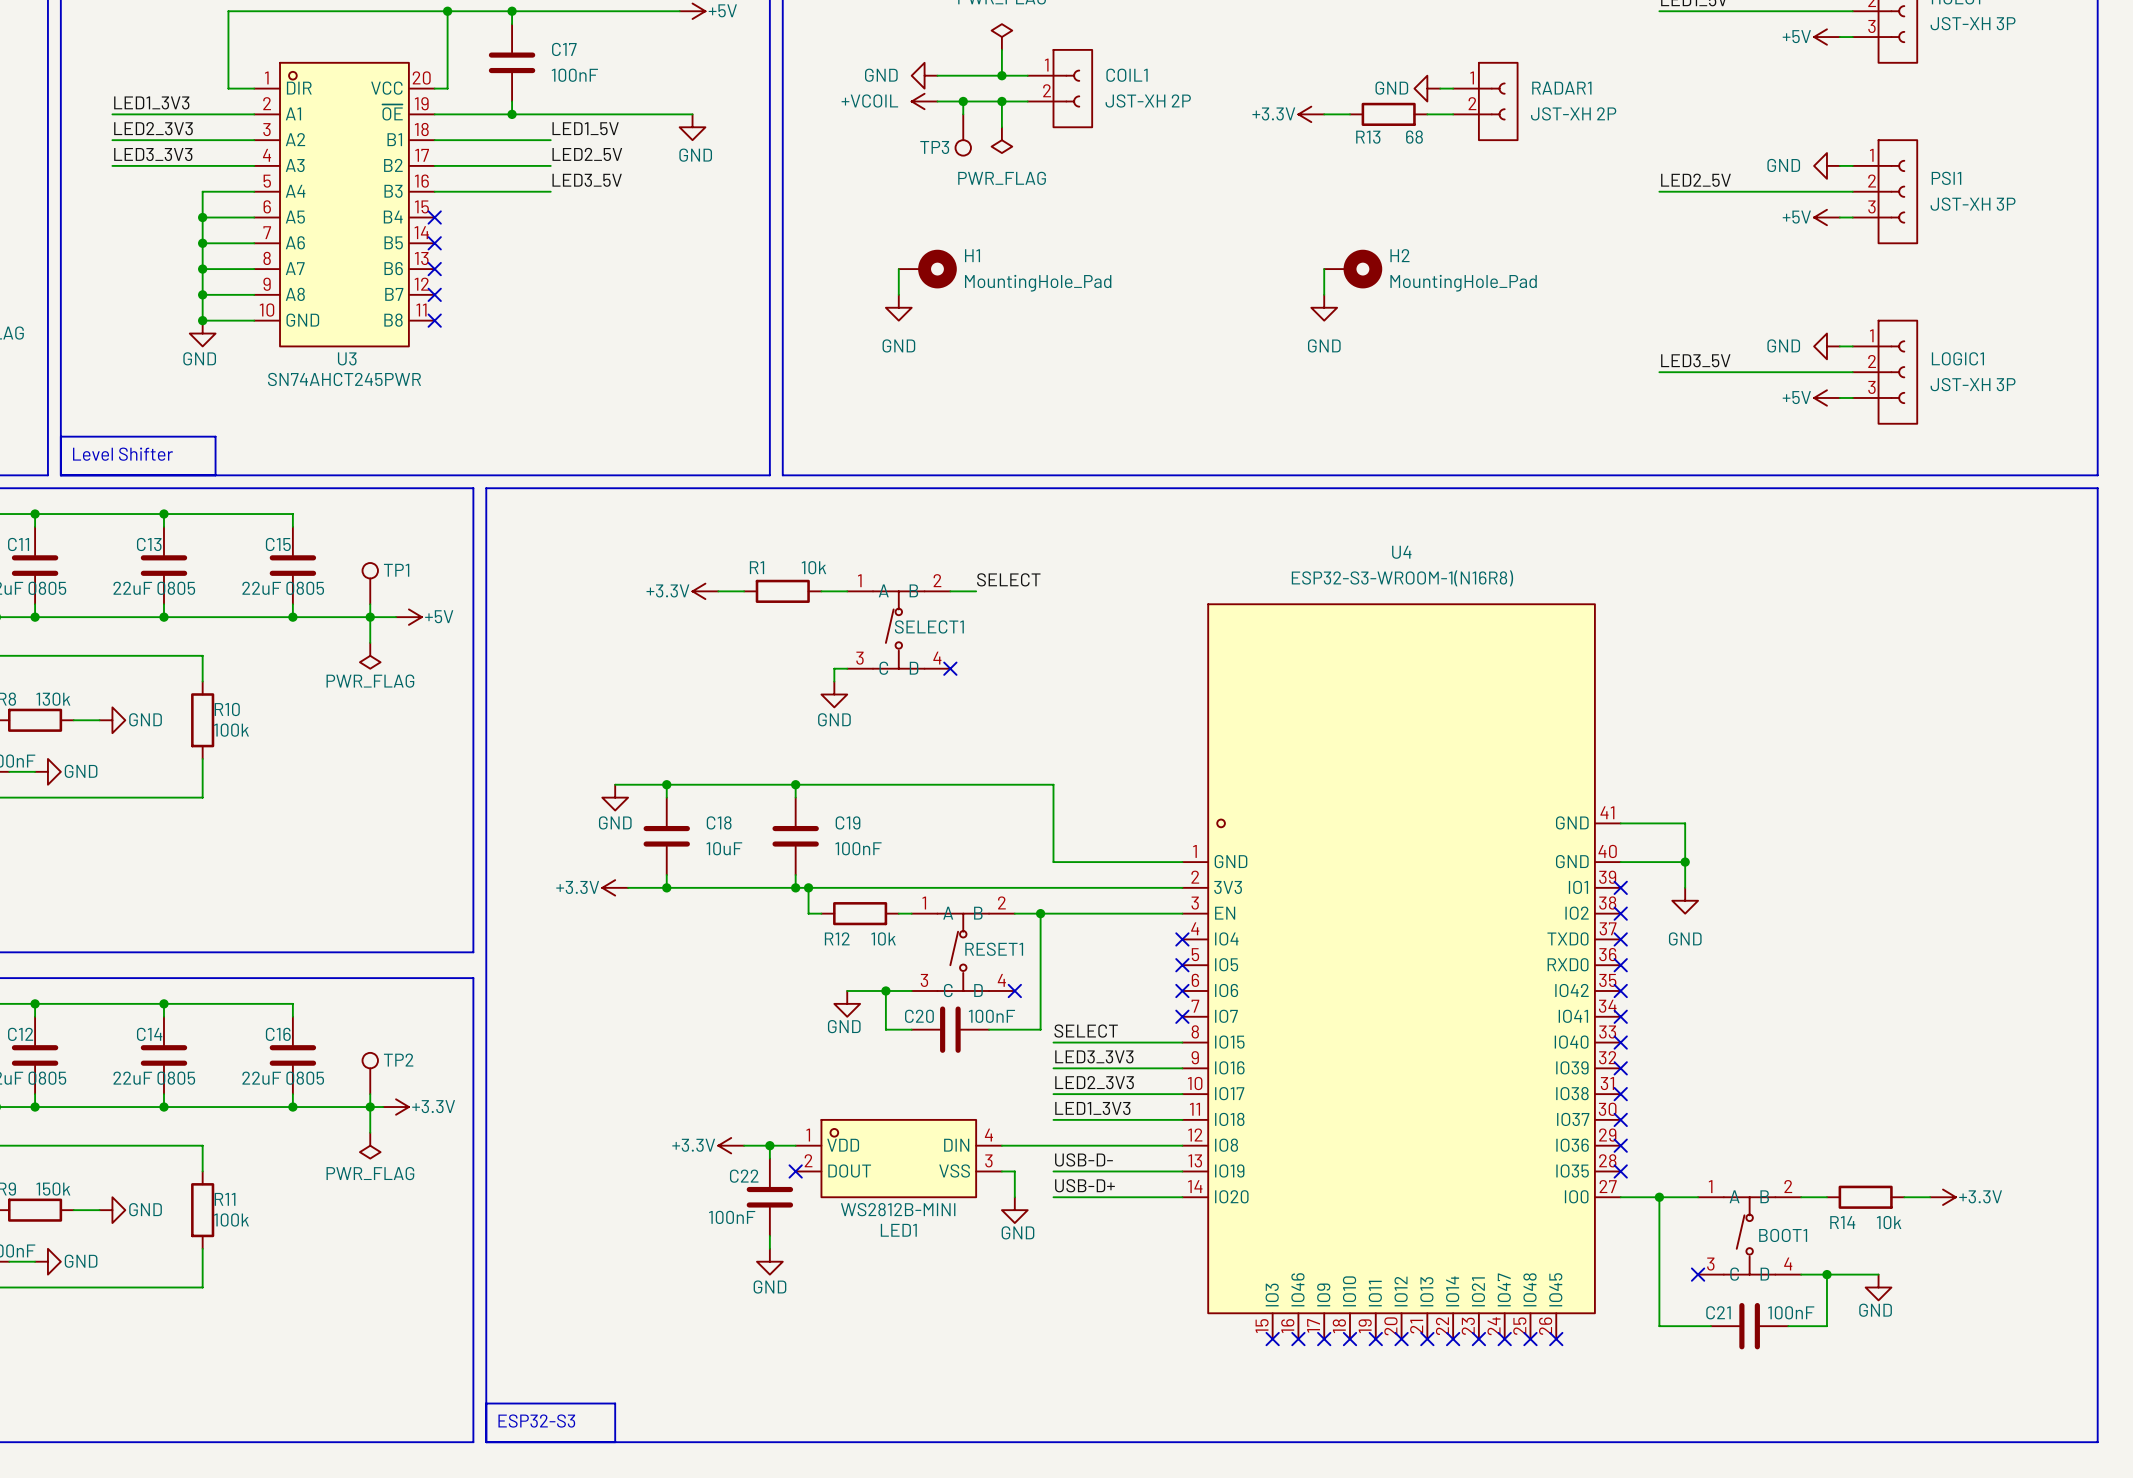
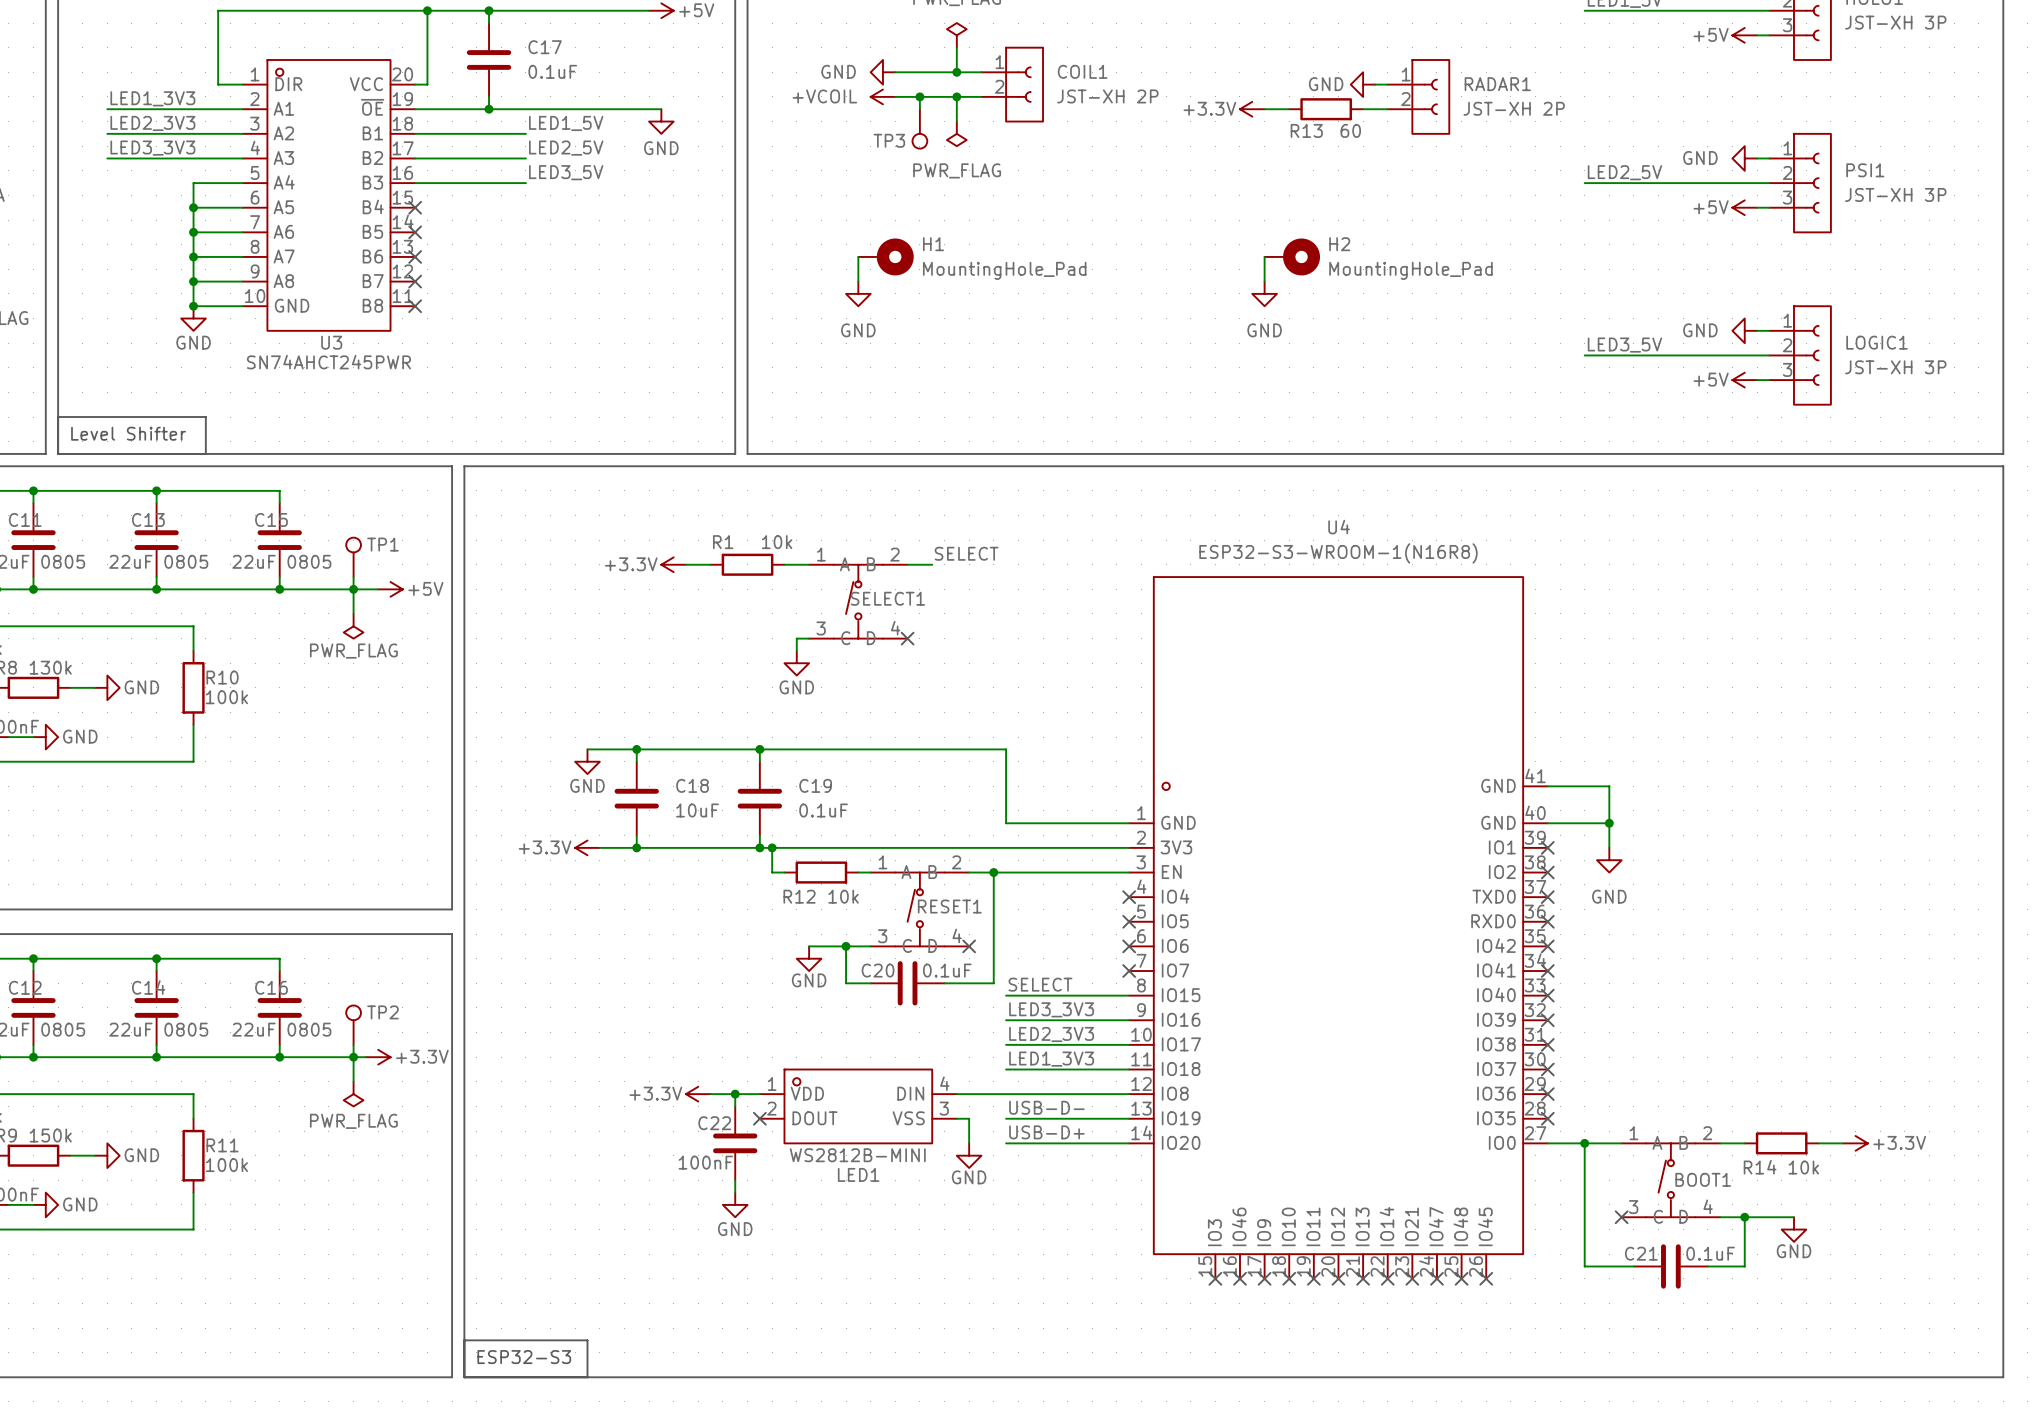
C17 value: 100nF (574, 75) -> 0.1uF (552, 71)
R13 value: 68 (1414, 137) -> 60 (1350, 130)
C19 value: 100nF (858, 848) -> 0.1uF (823, 810)
C20 value: 100nF (991, 1016) -> 0.1uF (947, 970)
C21 value: 100nF (1791, 1312) -> 0.1uF (1710, 1253)

